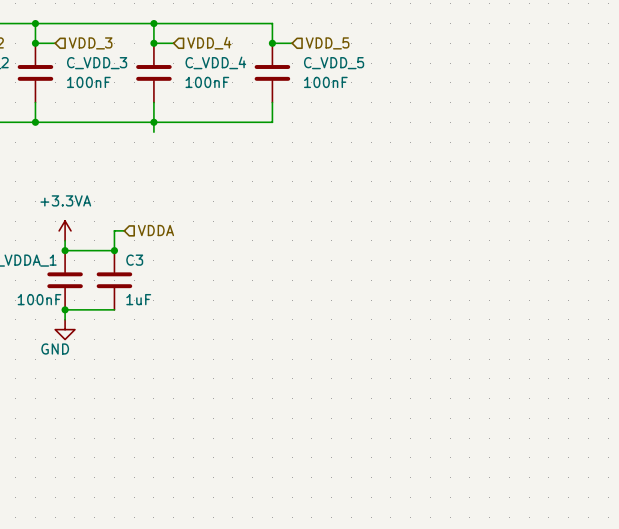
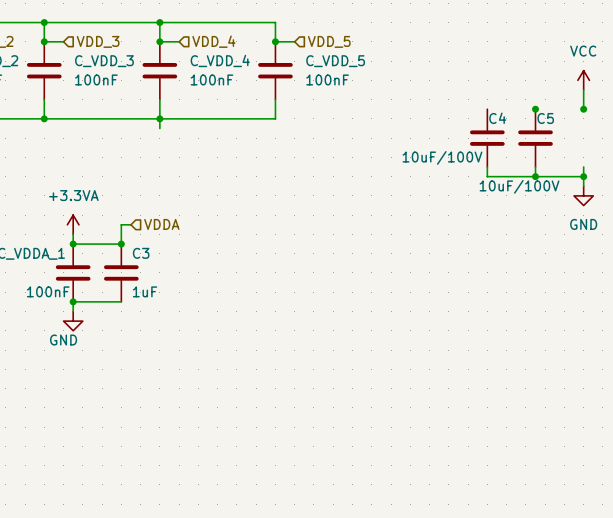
power symbol: none -> VCC (583, 80)
wire: none -> (583, 89) (583, 109)
junction: none -> (535, 109)
junction: none -> (583, 109)
C4: none -> 10uF/100V (487, 138)
C5: none -> 10uF/100V (535, 138)
wire: none -> (487, 167) (487, 176) (583, 176)
wire: none -> (535, 167) (535, 176)
wire: none -> (583, 167) (583, 186)
junction: none -> (535, 176)
junction: none -> (583, 176)
power symbol: none -> GND (583, 195)

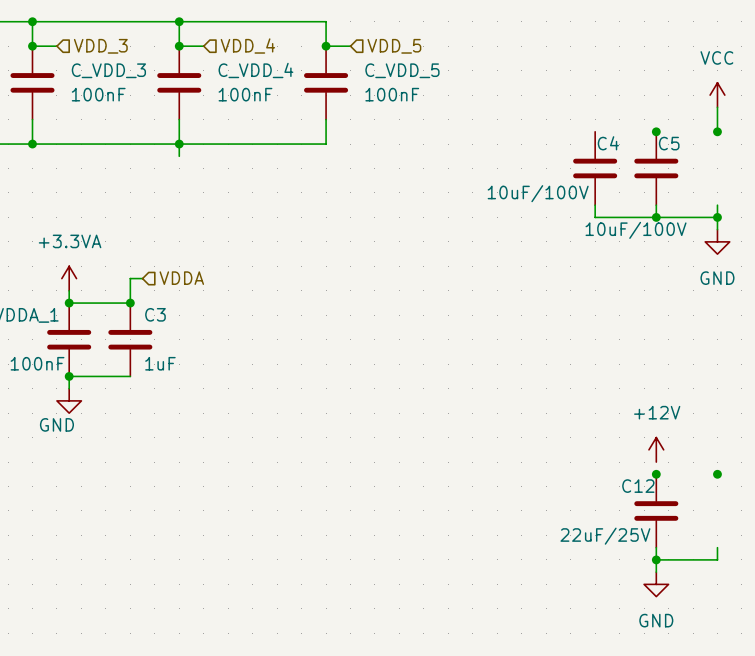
power symbol: none -> +12V (656, 449)
junction: none -> (656, 474)
junction: none -> (717, 474)
C12: none -> 22uF/25V (656, 510)
wire: none -> (656, 547) (656, 572)
wire: none -> (717, 547) (717, 559) (656, 559)
junction: none -> (656, 559)
power symbol: none -> GND (656, 584)

